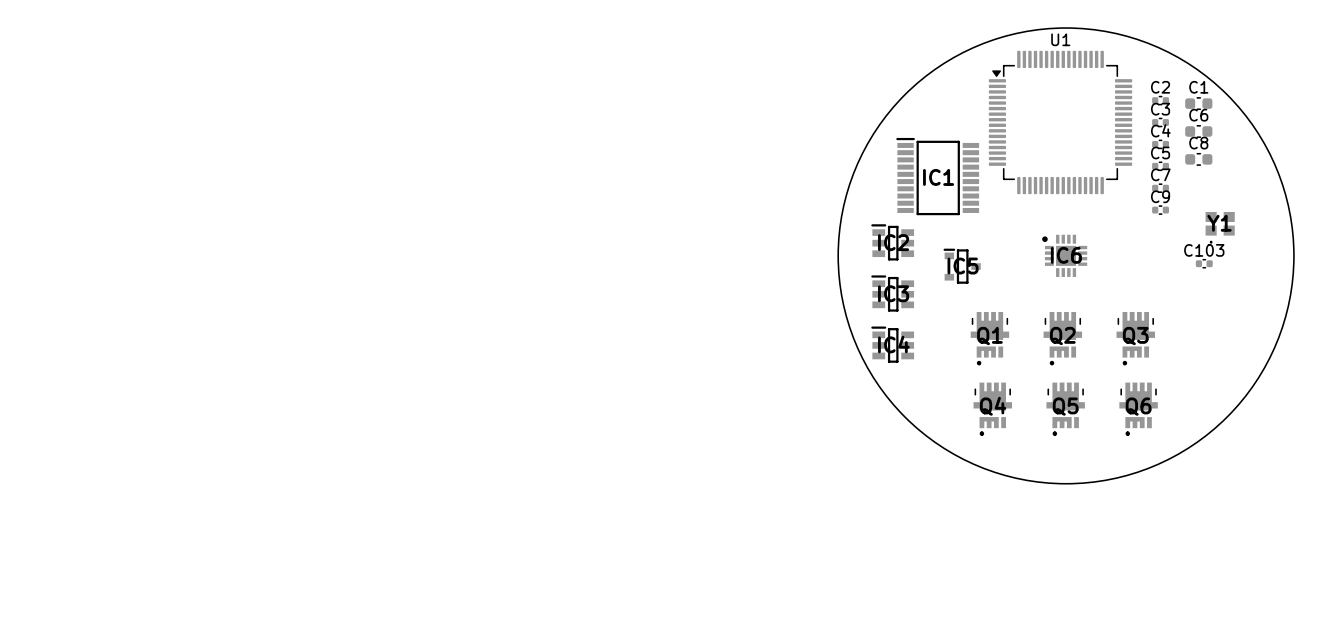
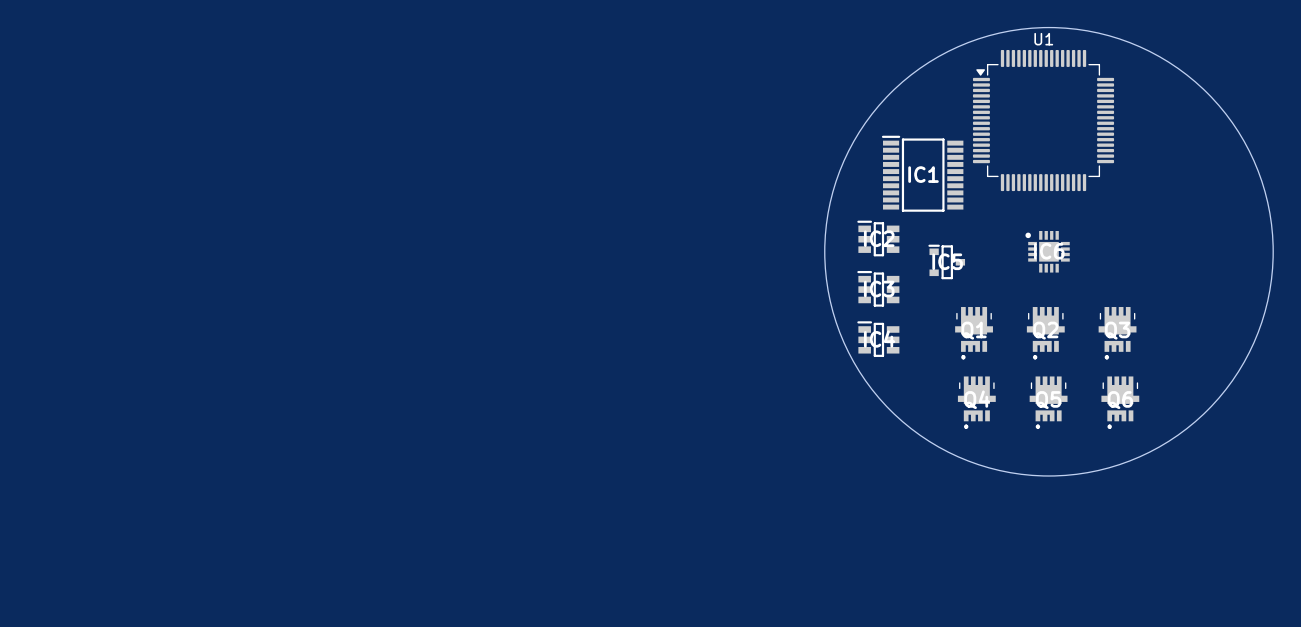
C2: (1160, 100) -> none
C1: (1198, 103) -> none
C3: (1160, 122) -> none
C6: (1198, 131) -> none
C4: (1160, 144) -> none
C8: (1198, 159) -> none
C5: (1160, 166) -> none
C7: (1160, 188) -> none
C9: (1160, 210) -> none
Y1: (1220, 227) -> none
C103: (1204, 263) -> none

